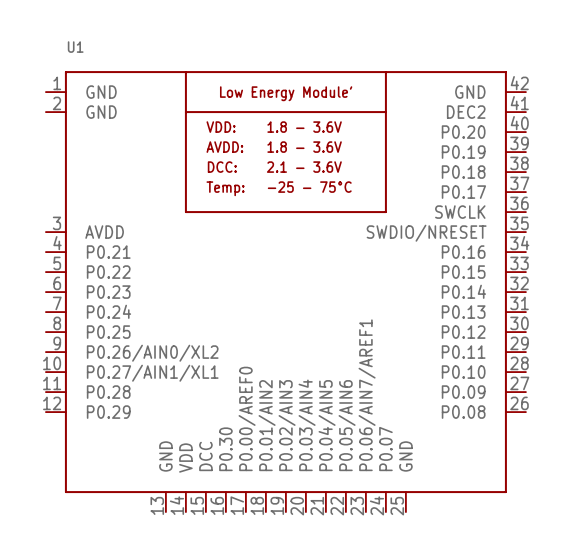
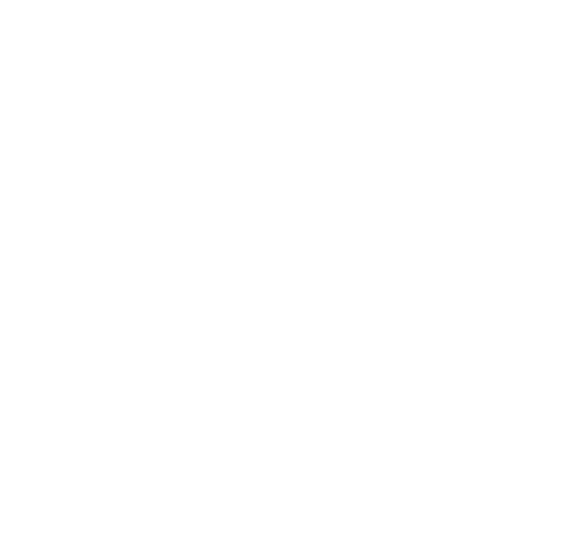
U1: (285, 291) -> none

